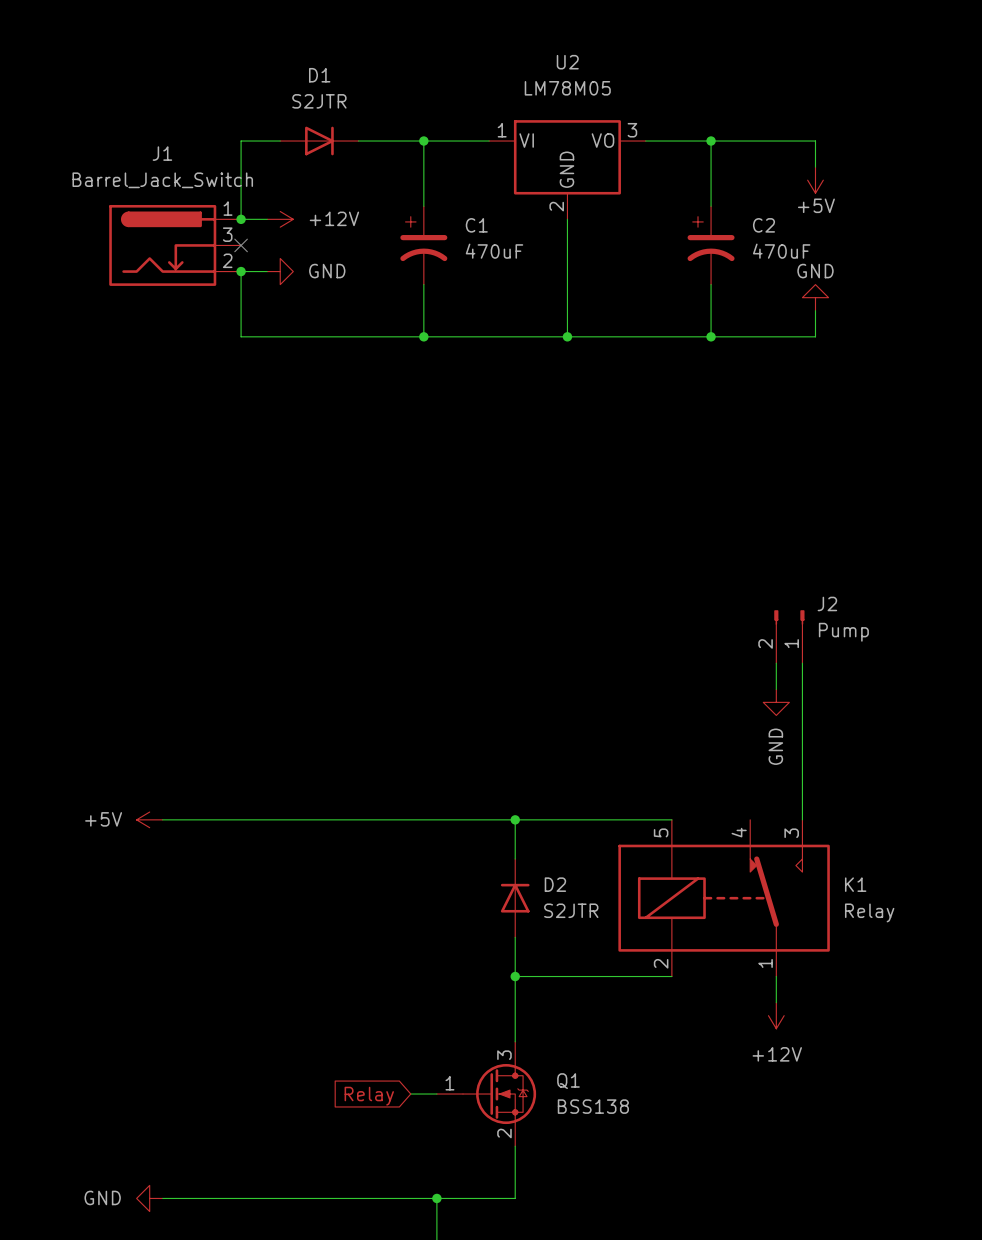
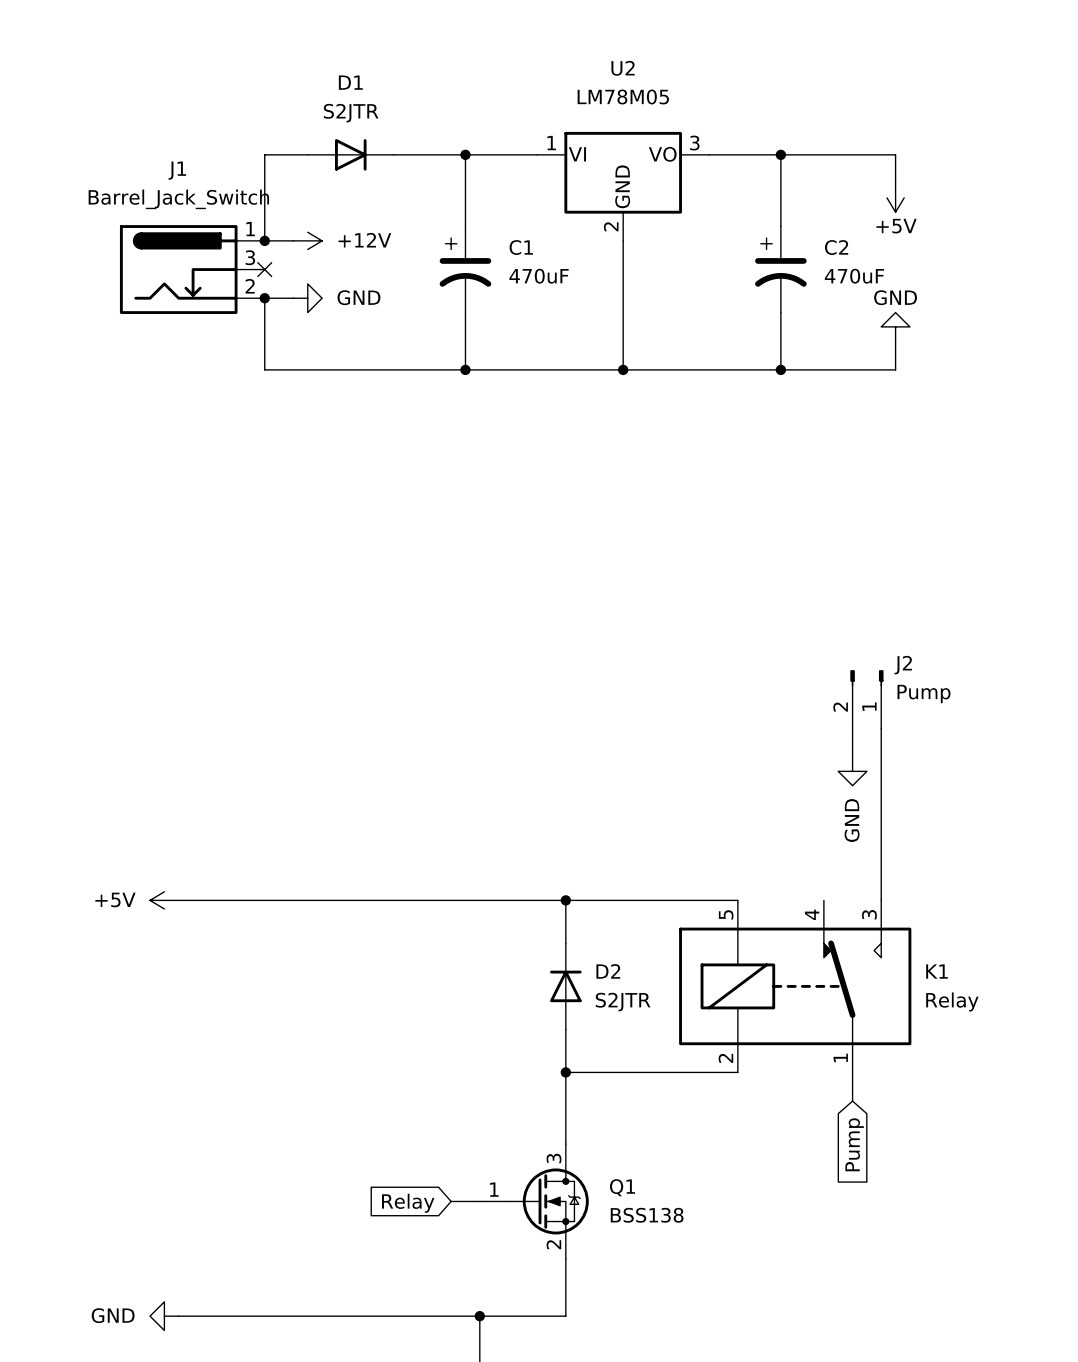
power symbol: +12V (776, 1015) -> none
global label: none -> Pump (854, 1144)

